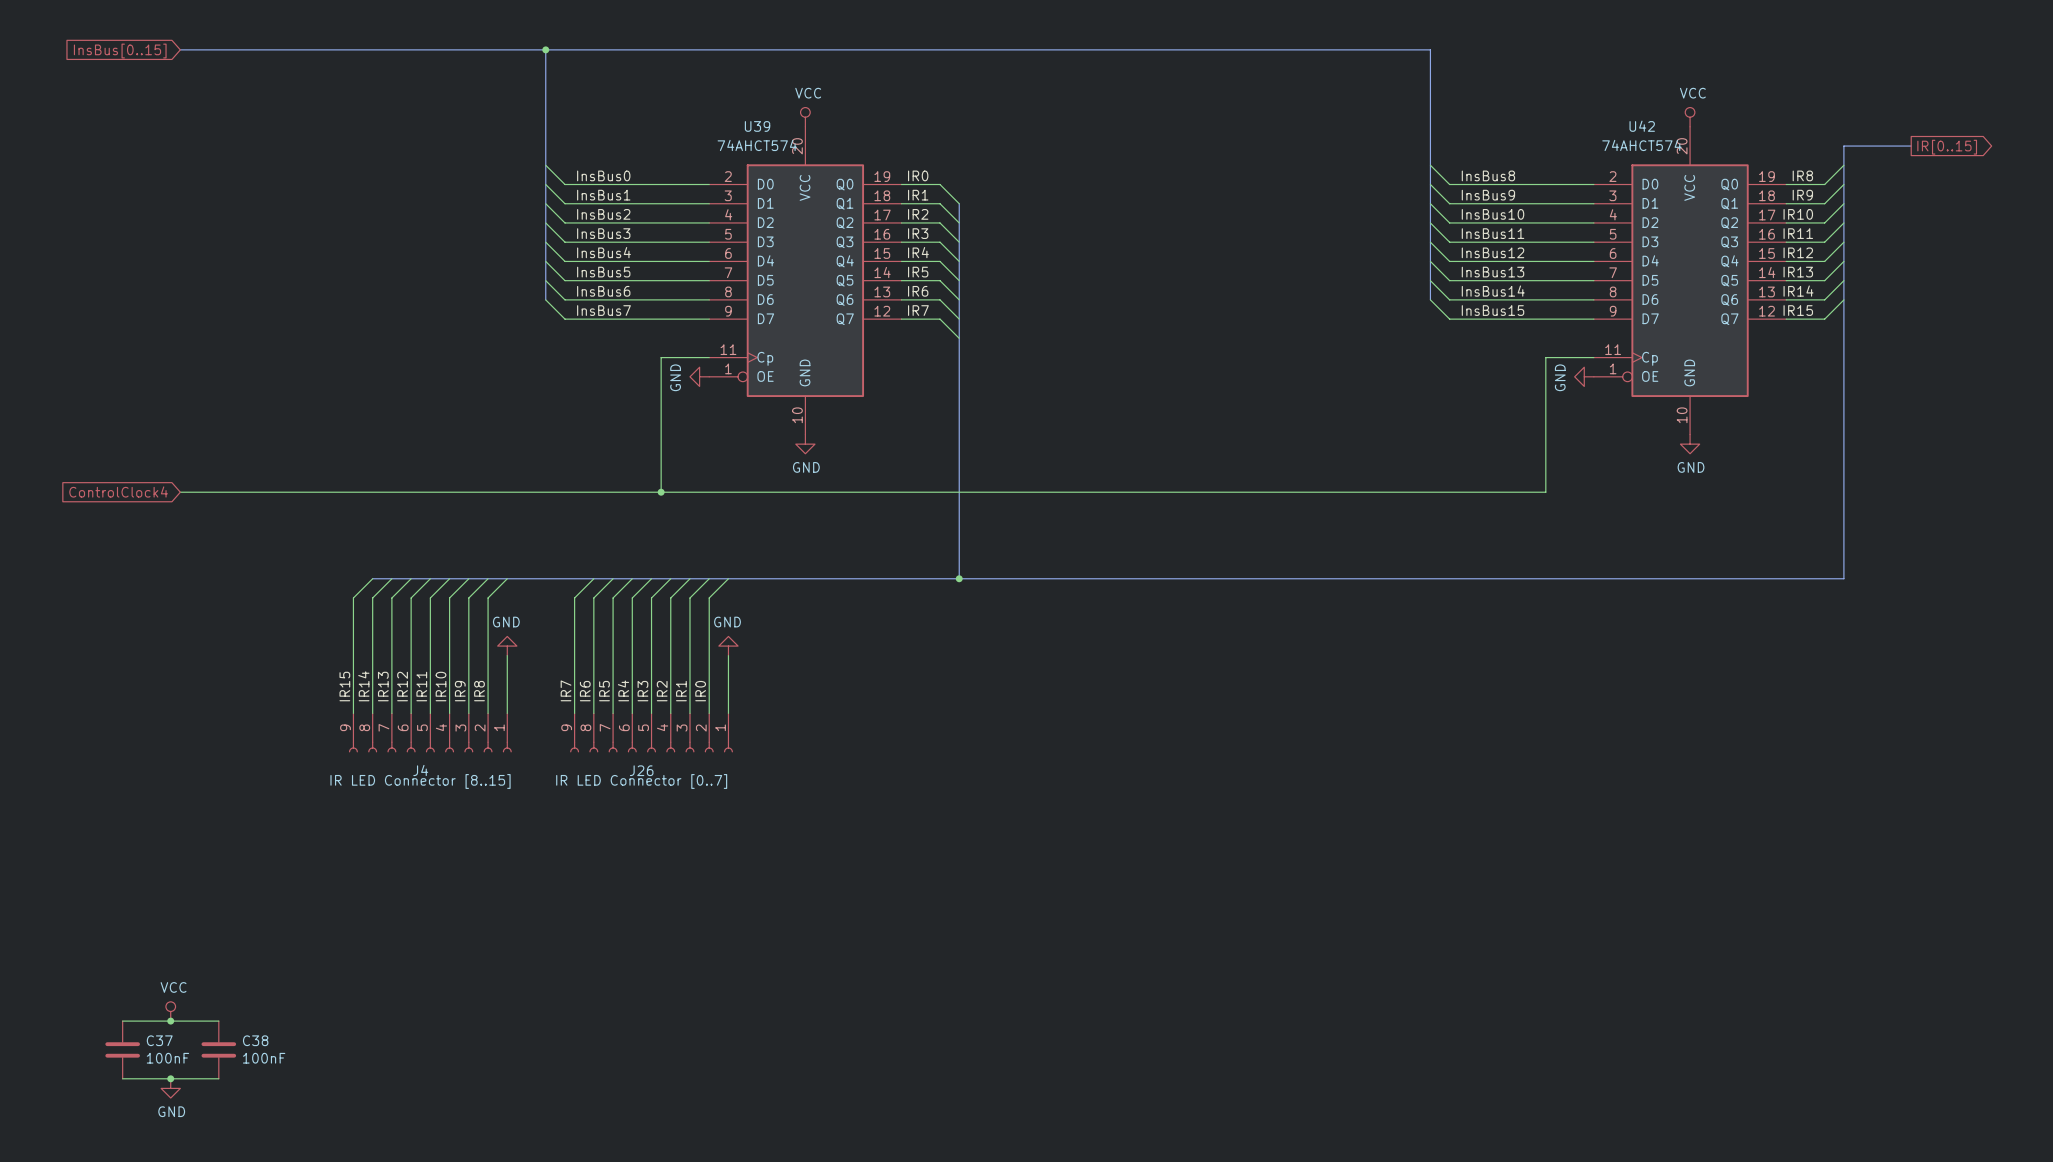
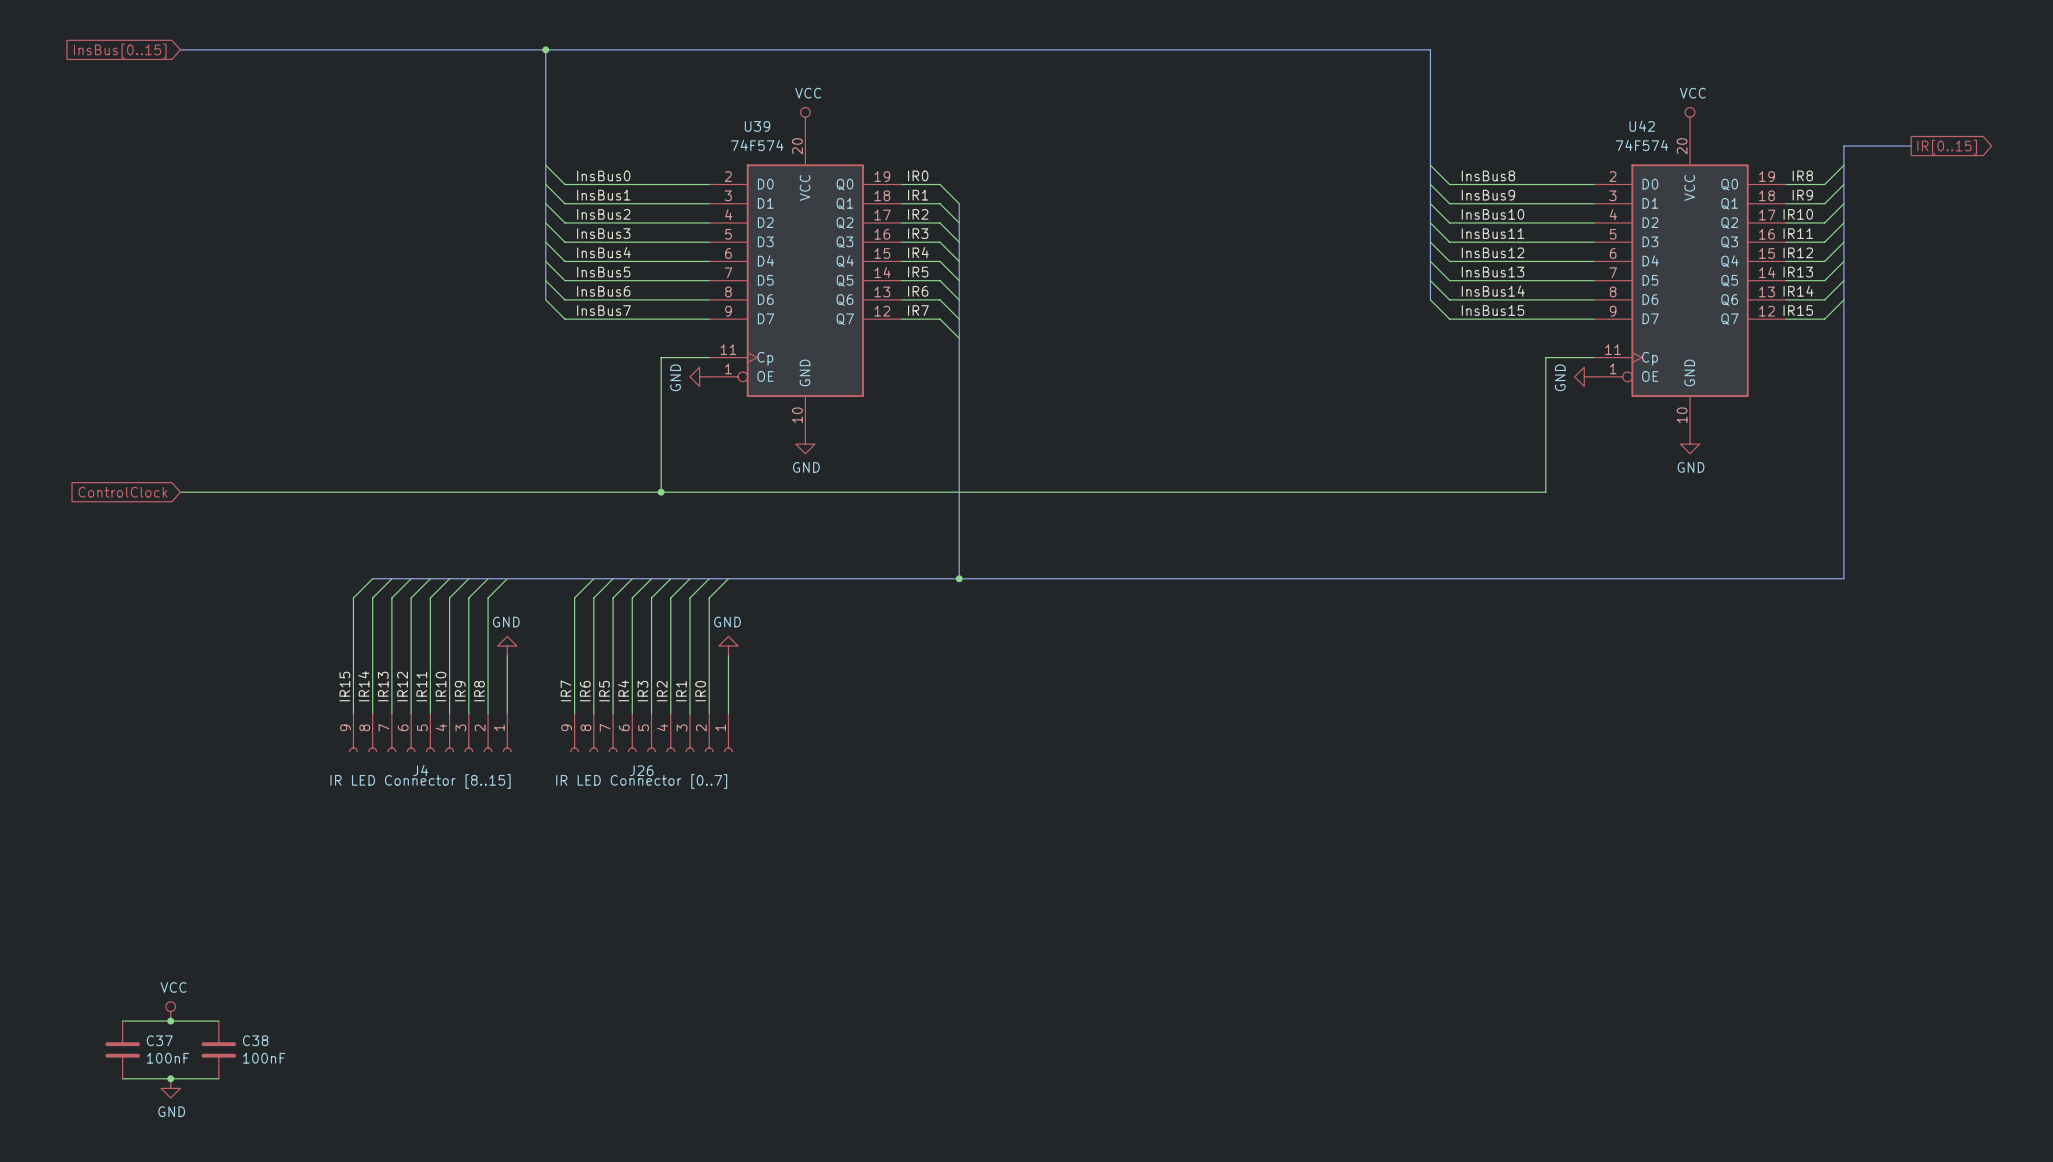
U39 value: 74AHCT574 (757, 145) -> 74F574 (757, 145)
U42 value: 74AHCT574 (1641, 145) -> 74F574 (1641, 145)
global label: ControlClock4 (118, 491) -> ControlClock (122, 492)

